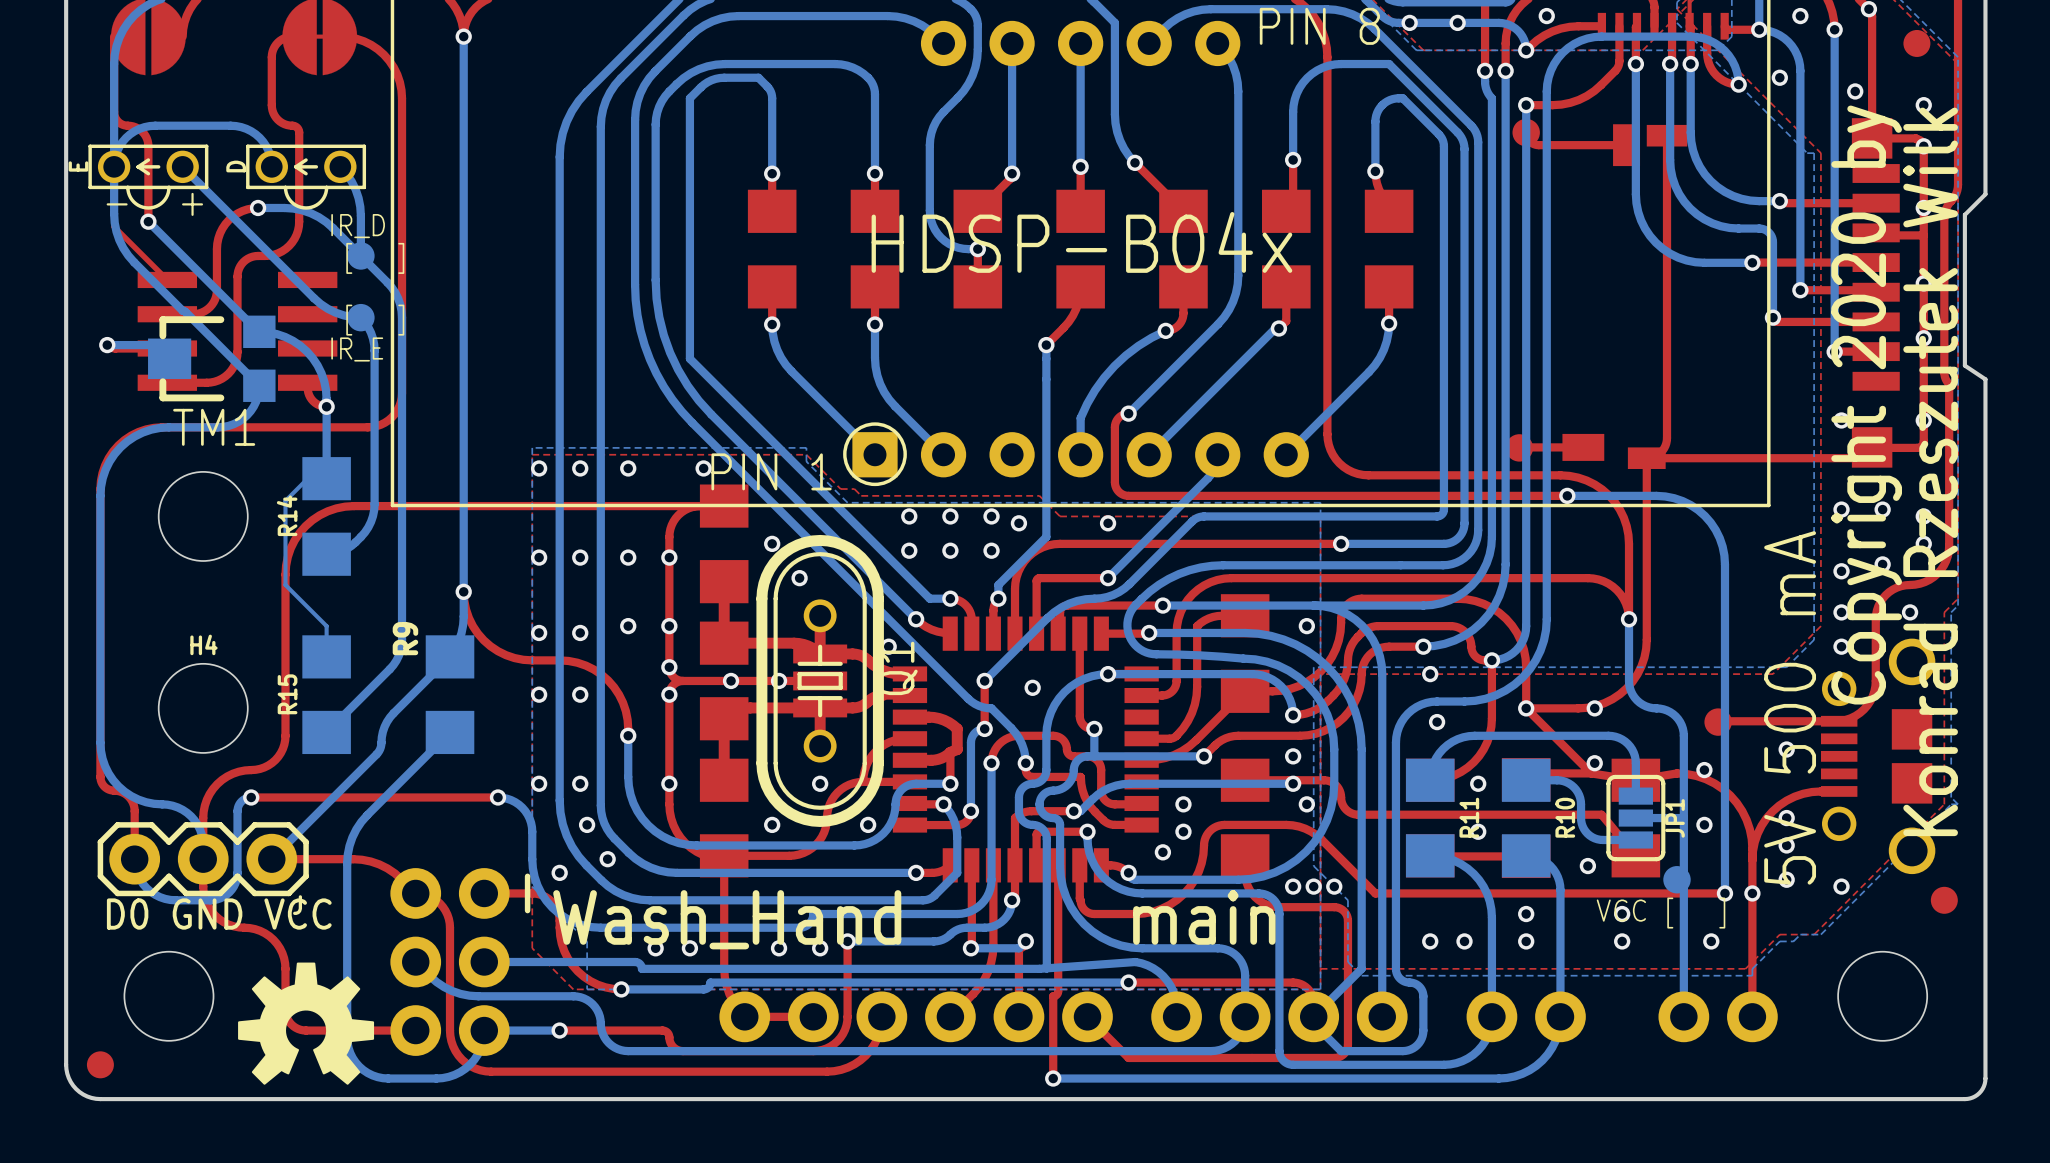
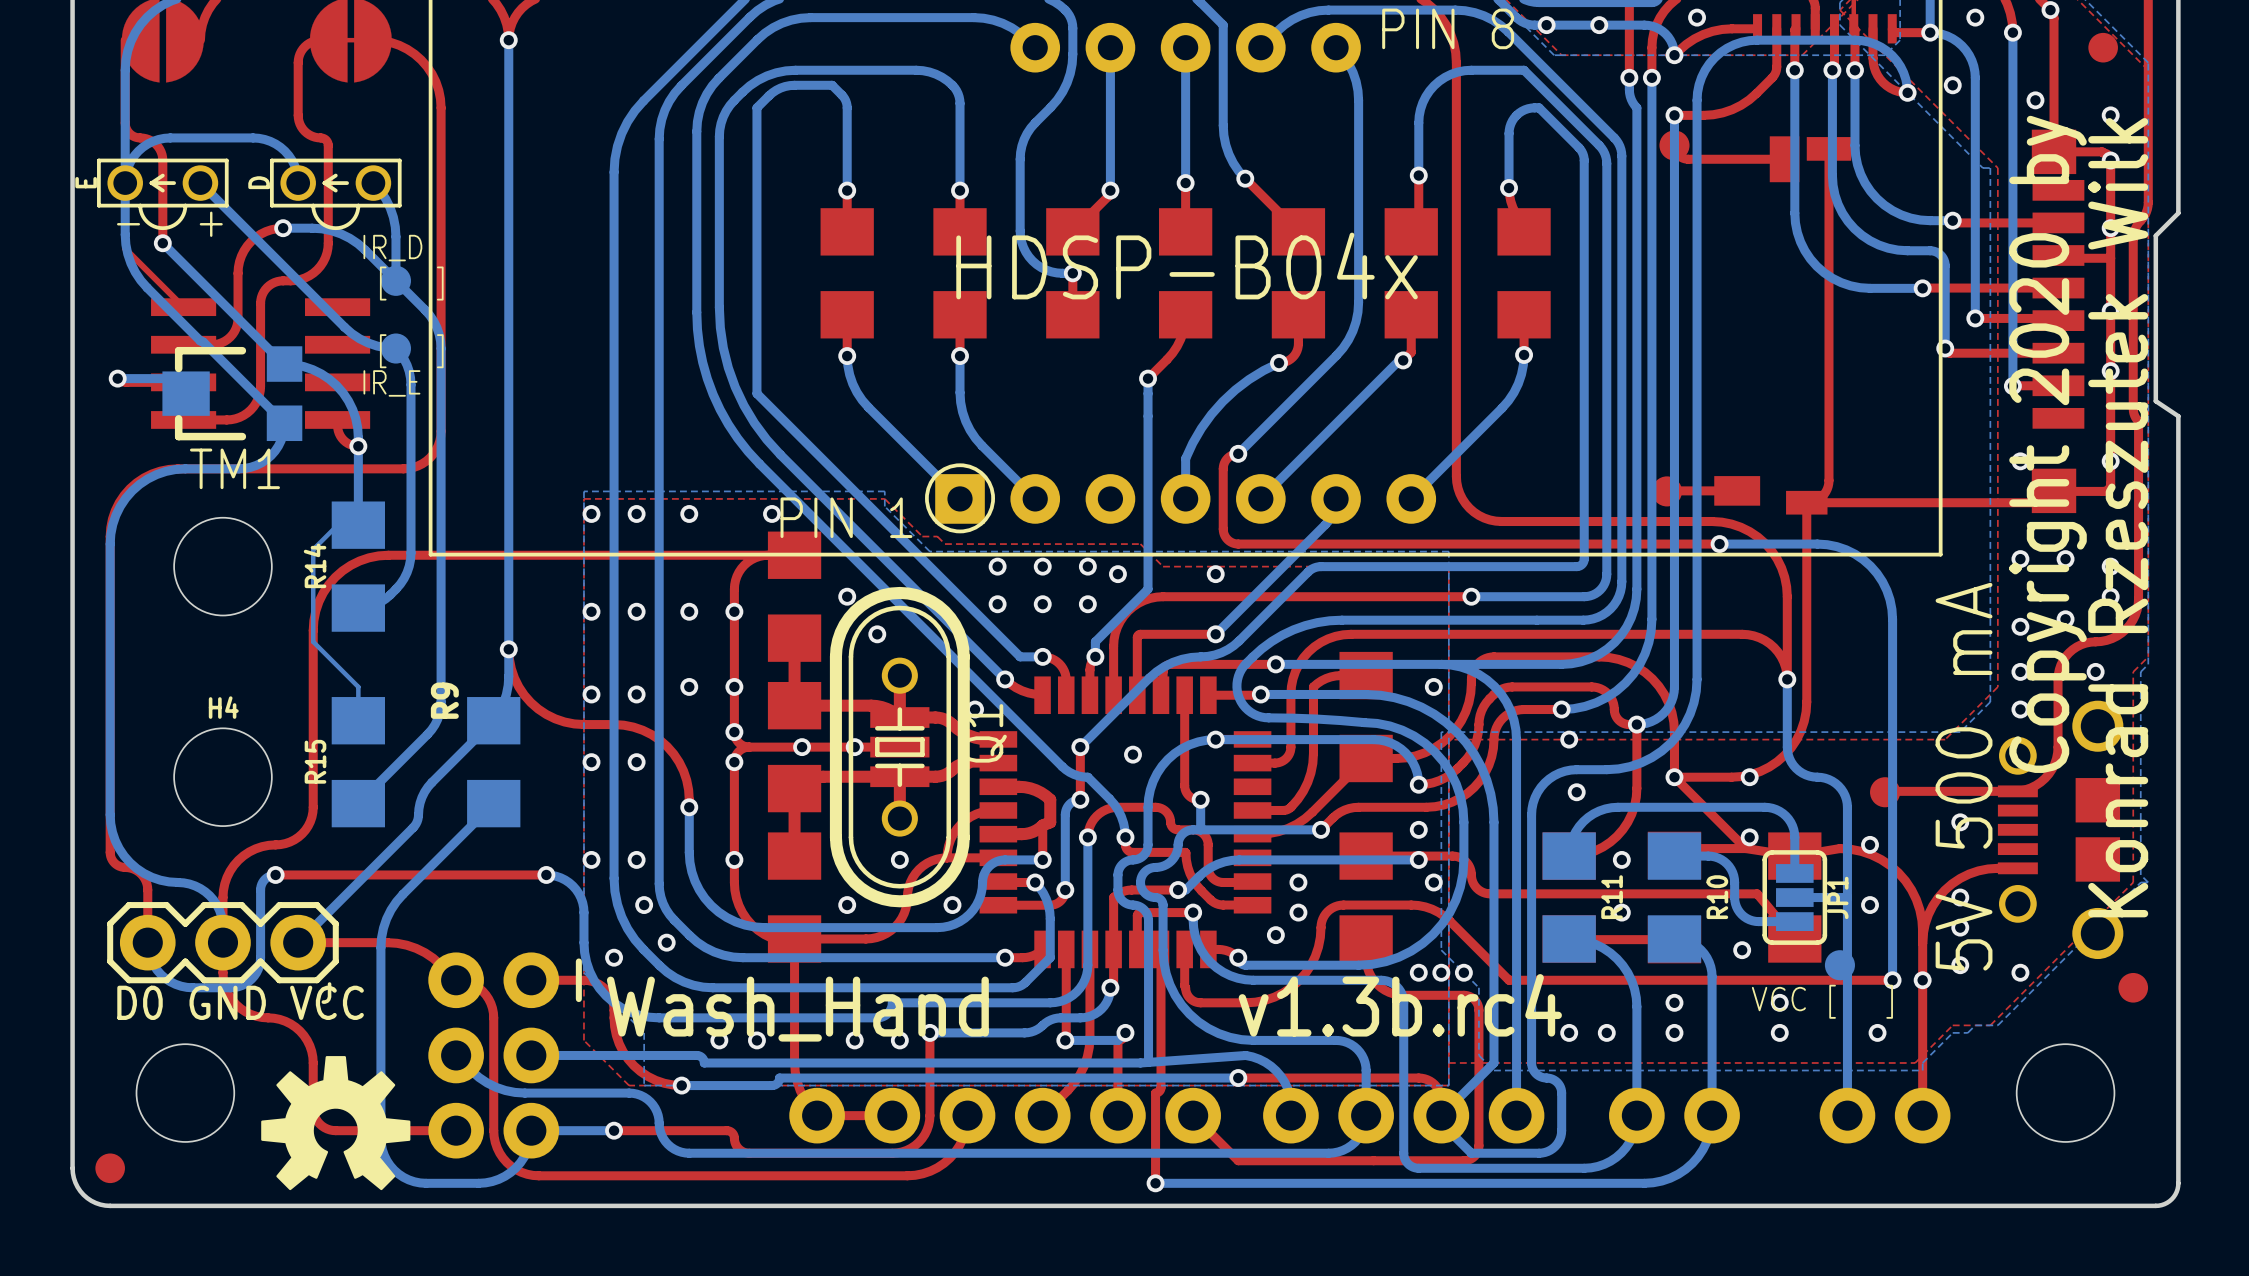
text: main (1204, 917) -> v1.3b.rc4 (1400, 1005)

